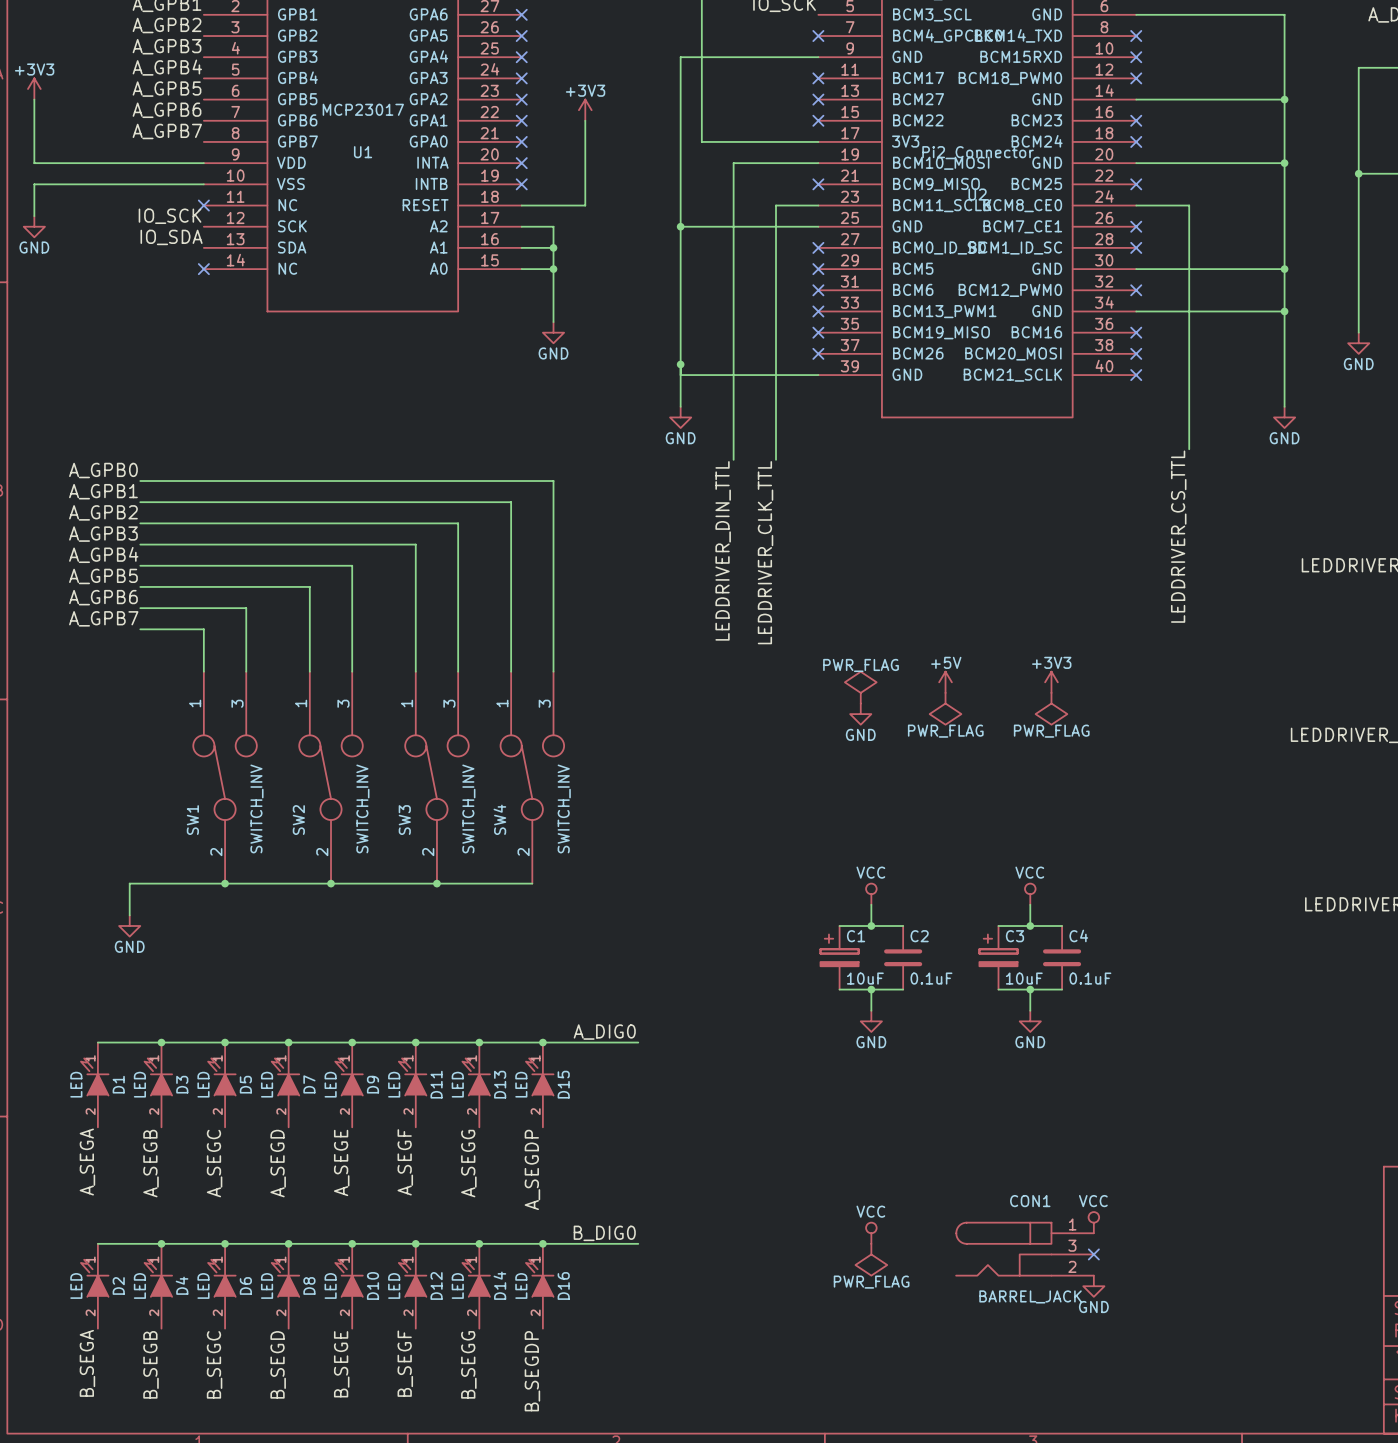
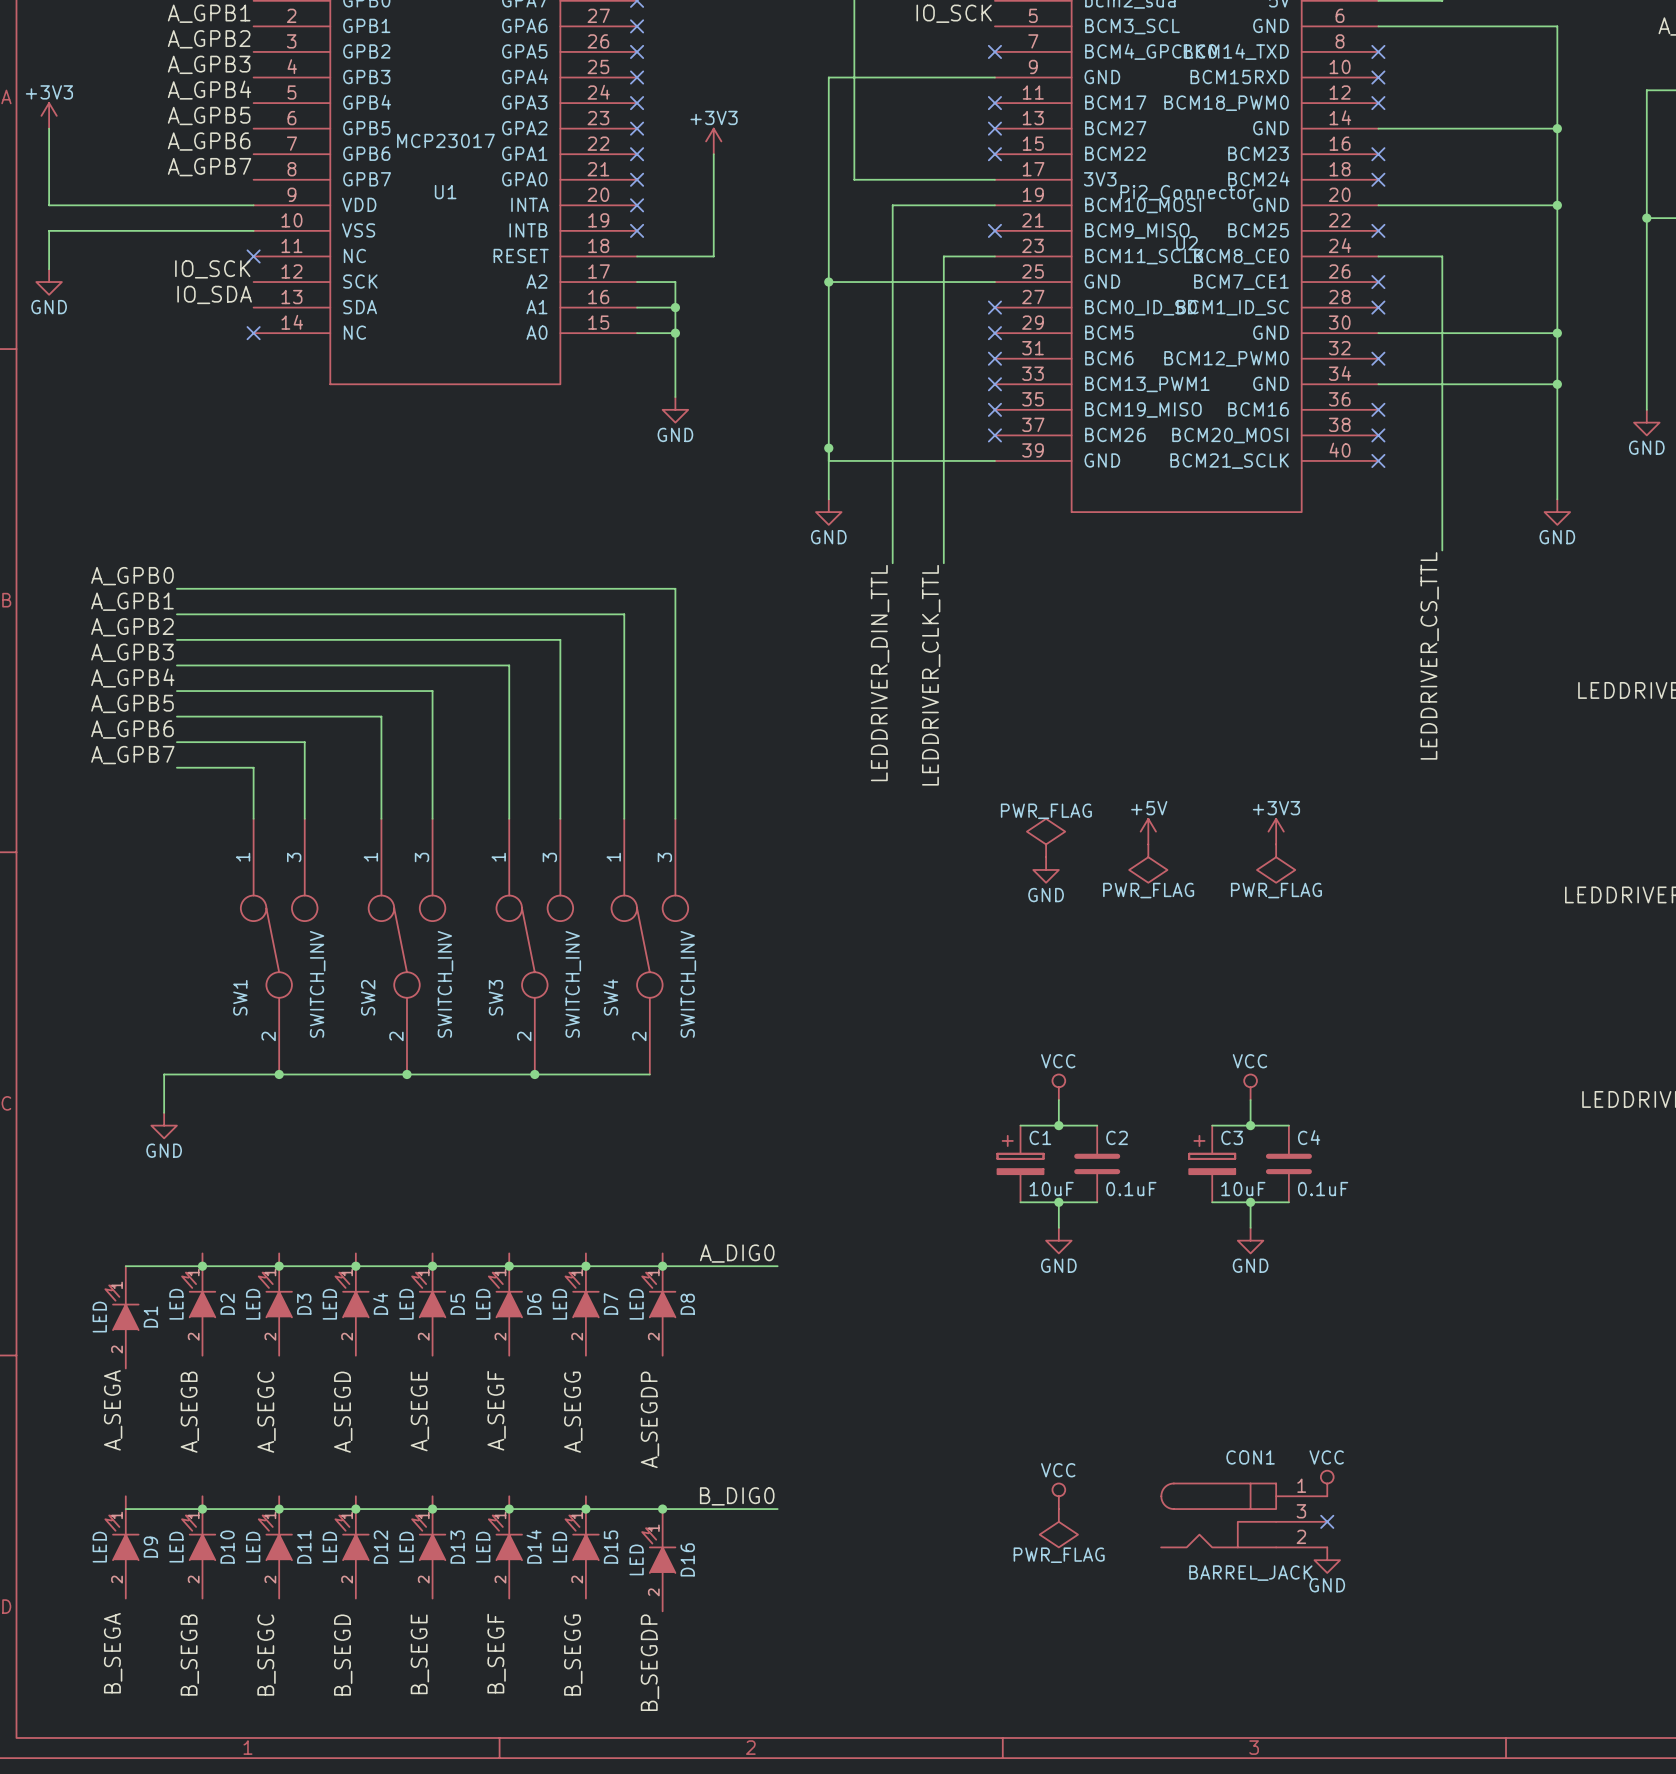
D3 position: (158, 1084) -> (275, 1304)
D5 position: (221, 1084) -> (428, 1304)
D7 position: (285, 1084) -> (582, 1304)
D9 position: (349, 1084) -> (121, 1547)
D11 position: (412, 1084) -> (275, 1547)
D13 position: (476, 1084) -> (428, 1547)
D15 position: (539, 1084) -> (582, 1547)
D2 position: (94, 1286) -> (198, 1304)
D4 position: (158, 1286) -> (352, 1304)
D6 position: (221, 1286) -> (505, 1304)
D8 position: (285, 1286) -> (658, 1304)
D10 position: (349, 1286) -> (198, 1547)
D12 position: (412, 1286) -> (352, 1547)
D14 position: (476, 1286) -> (505, 1547)

